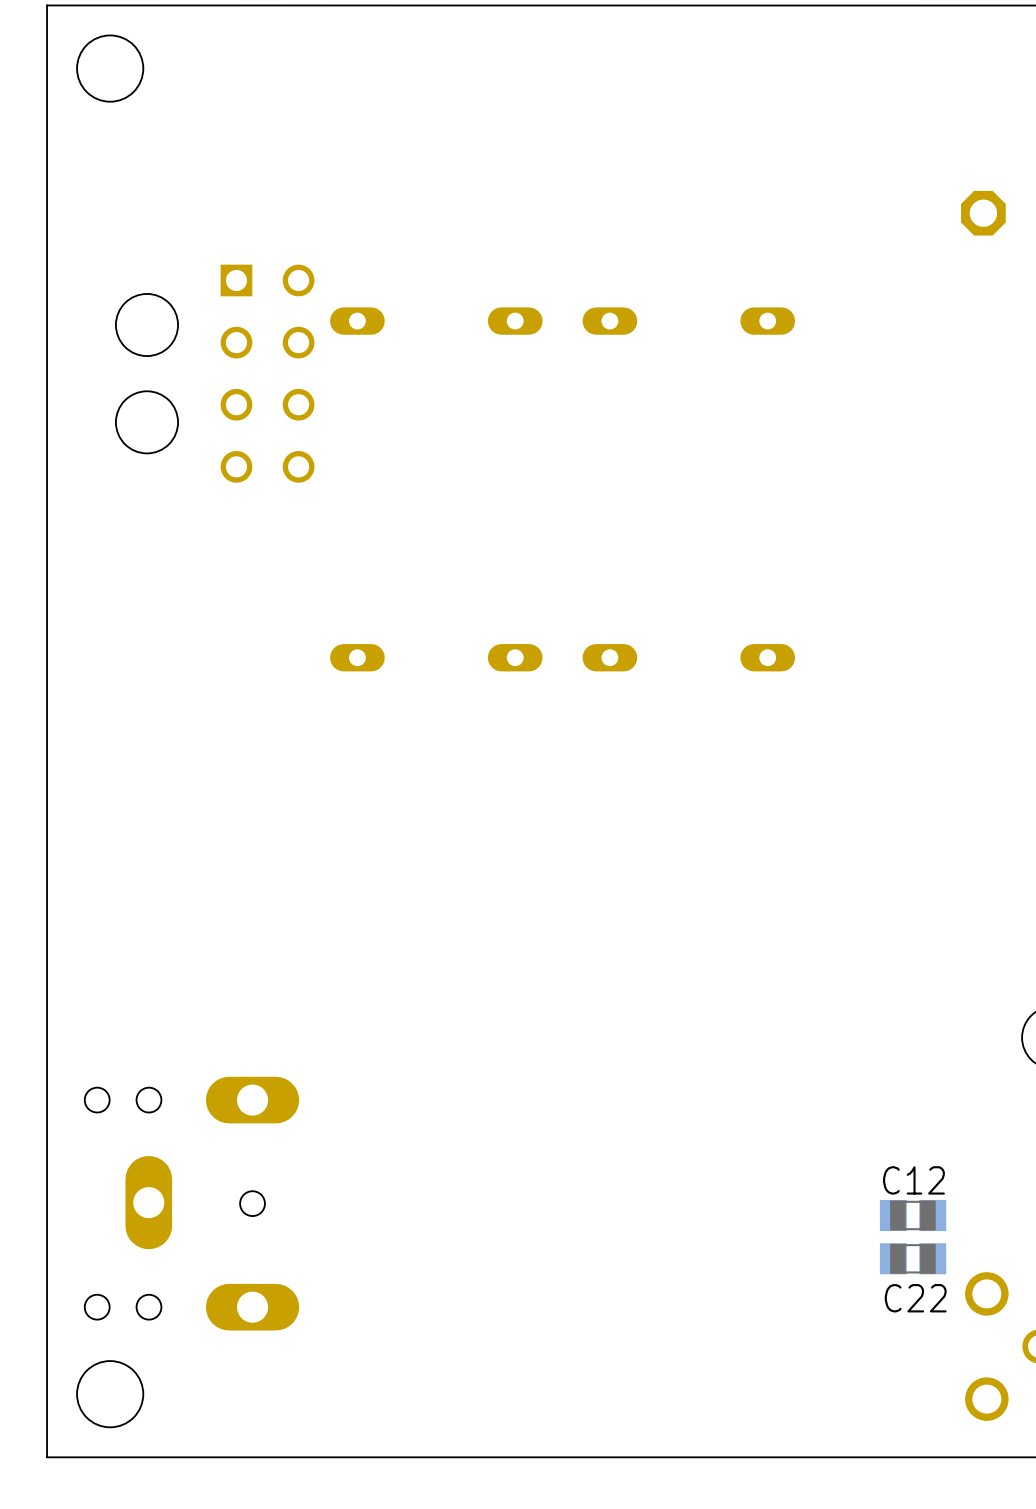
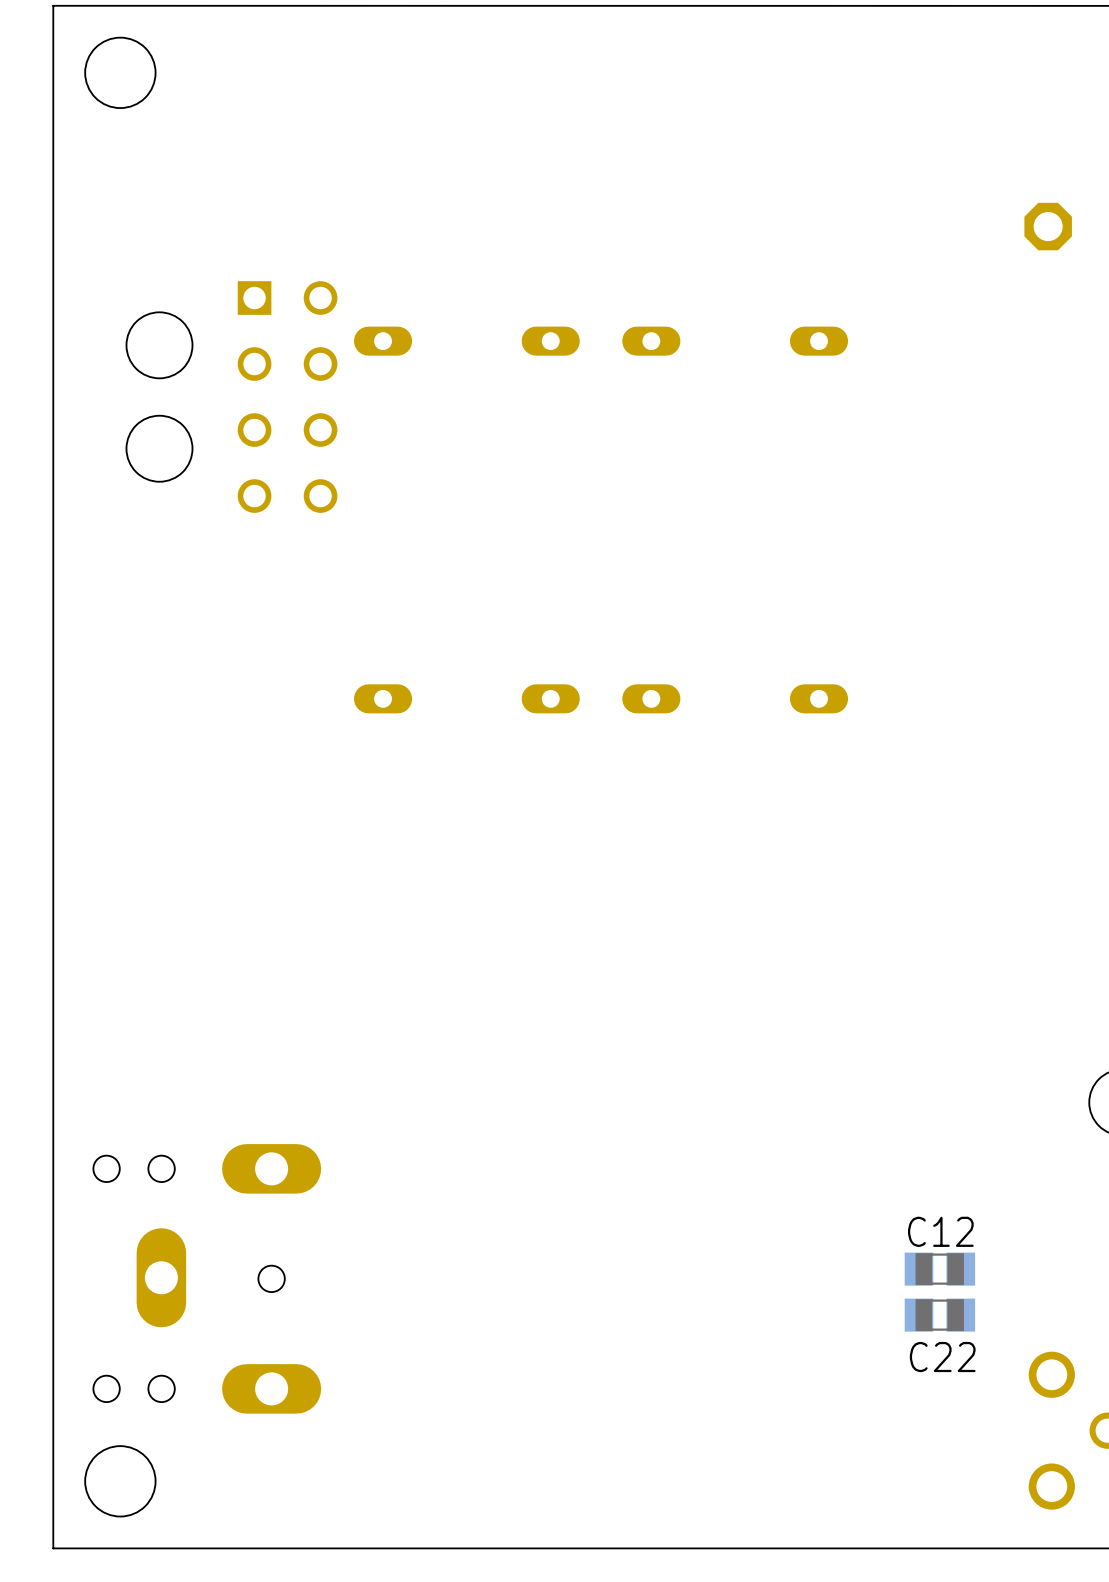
C12 position: (913, 1215) -> (939, 1269)
C22 position: (913, 1258) -> (939, 1315)

